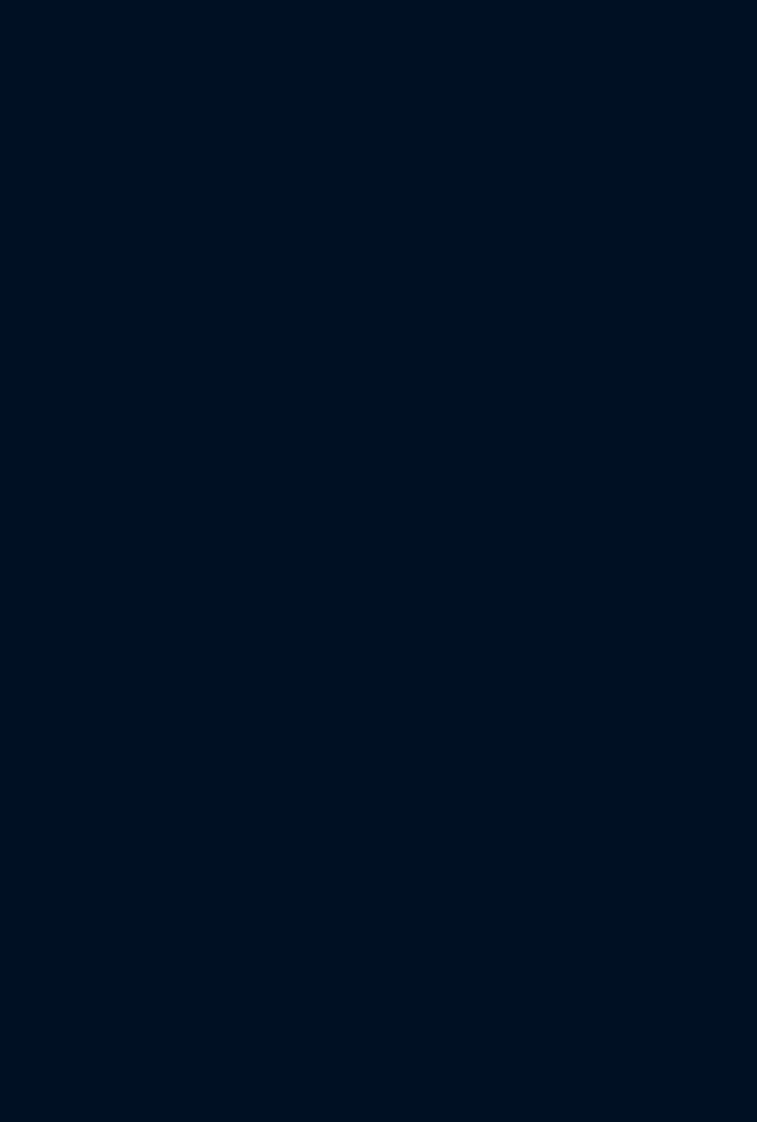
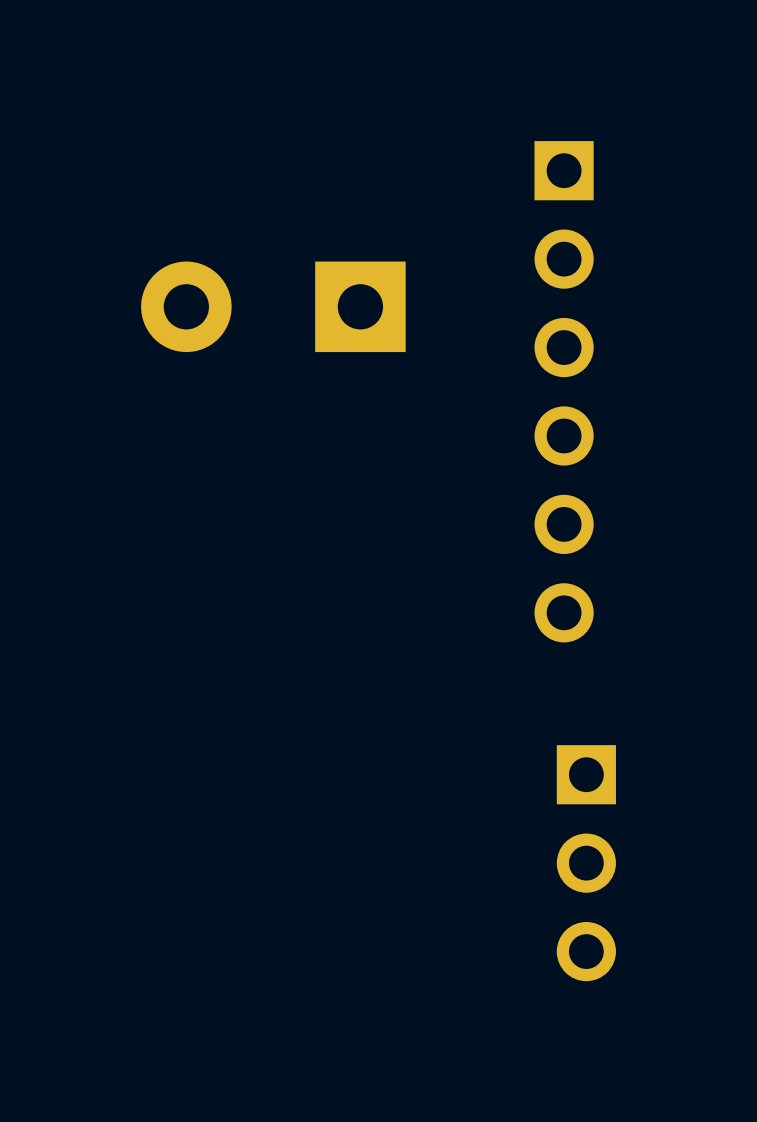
part: none -> (273, 306)
part: none -> (564, 391)
part: none -> (586, 863)

